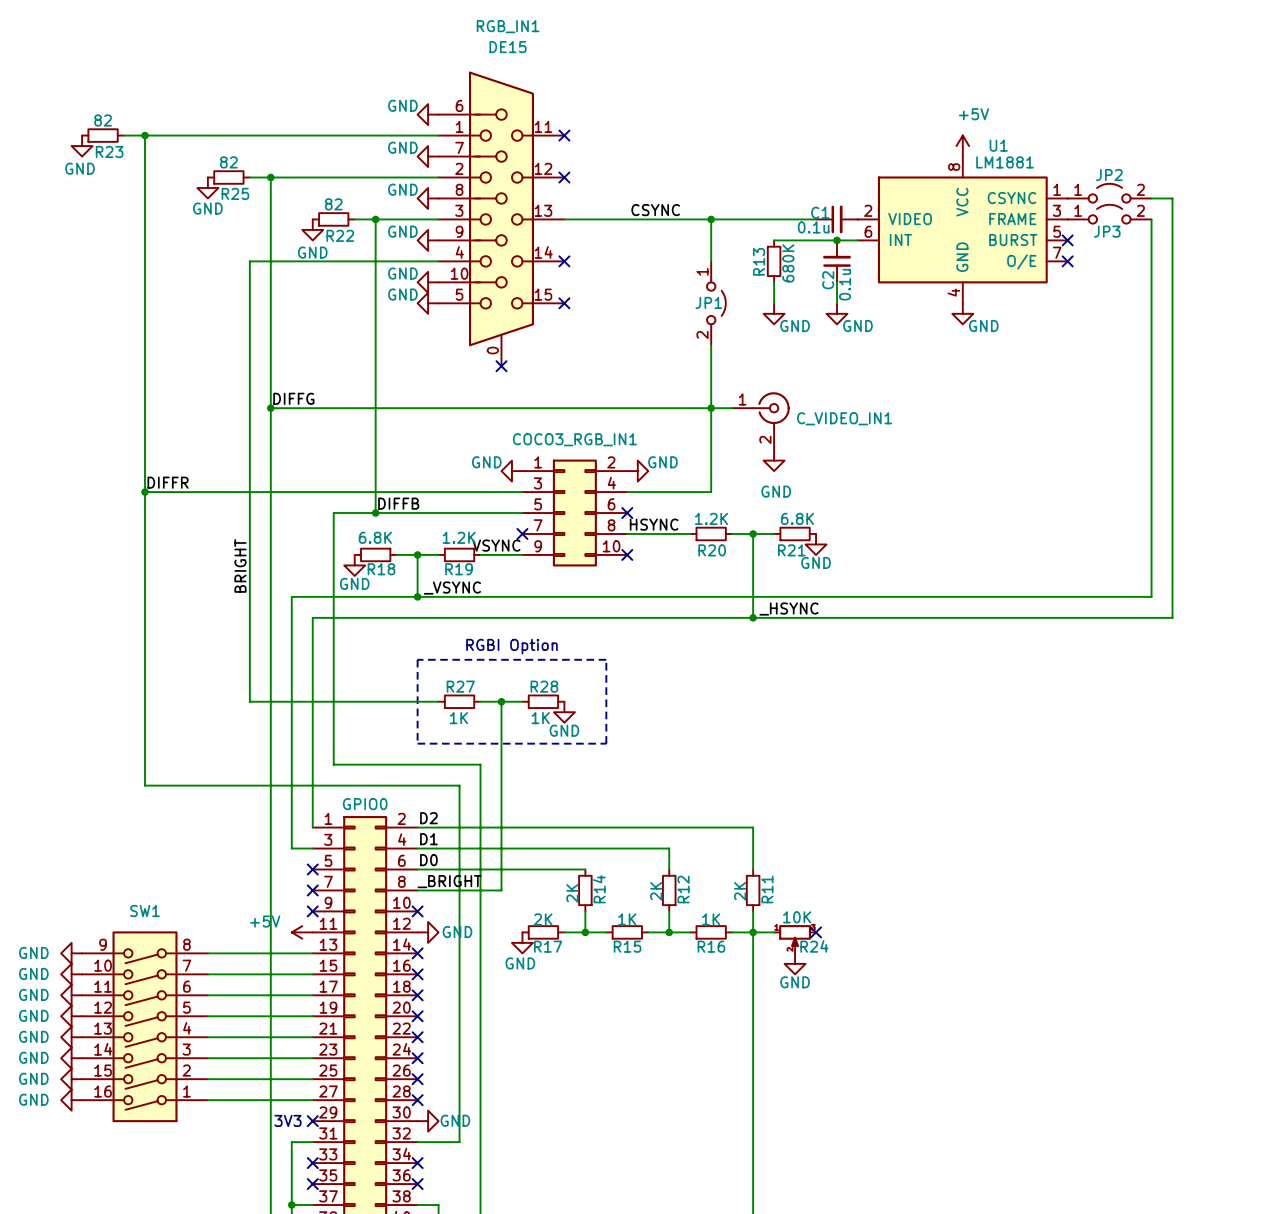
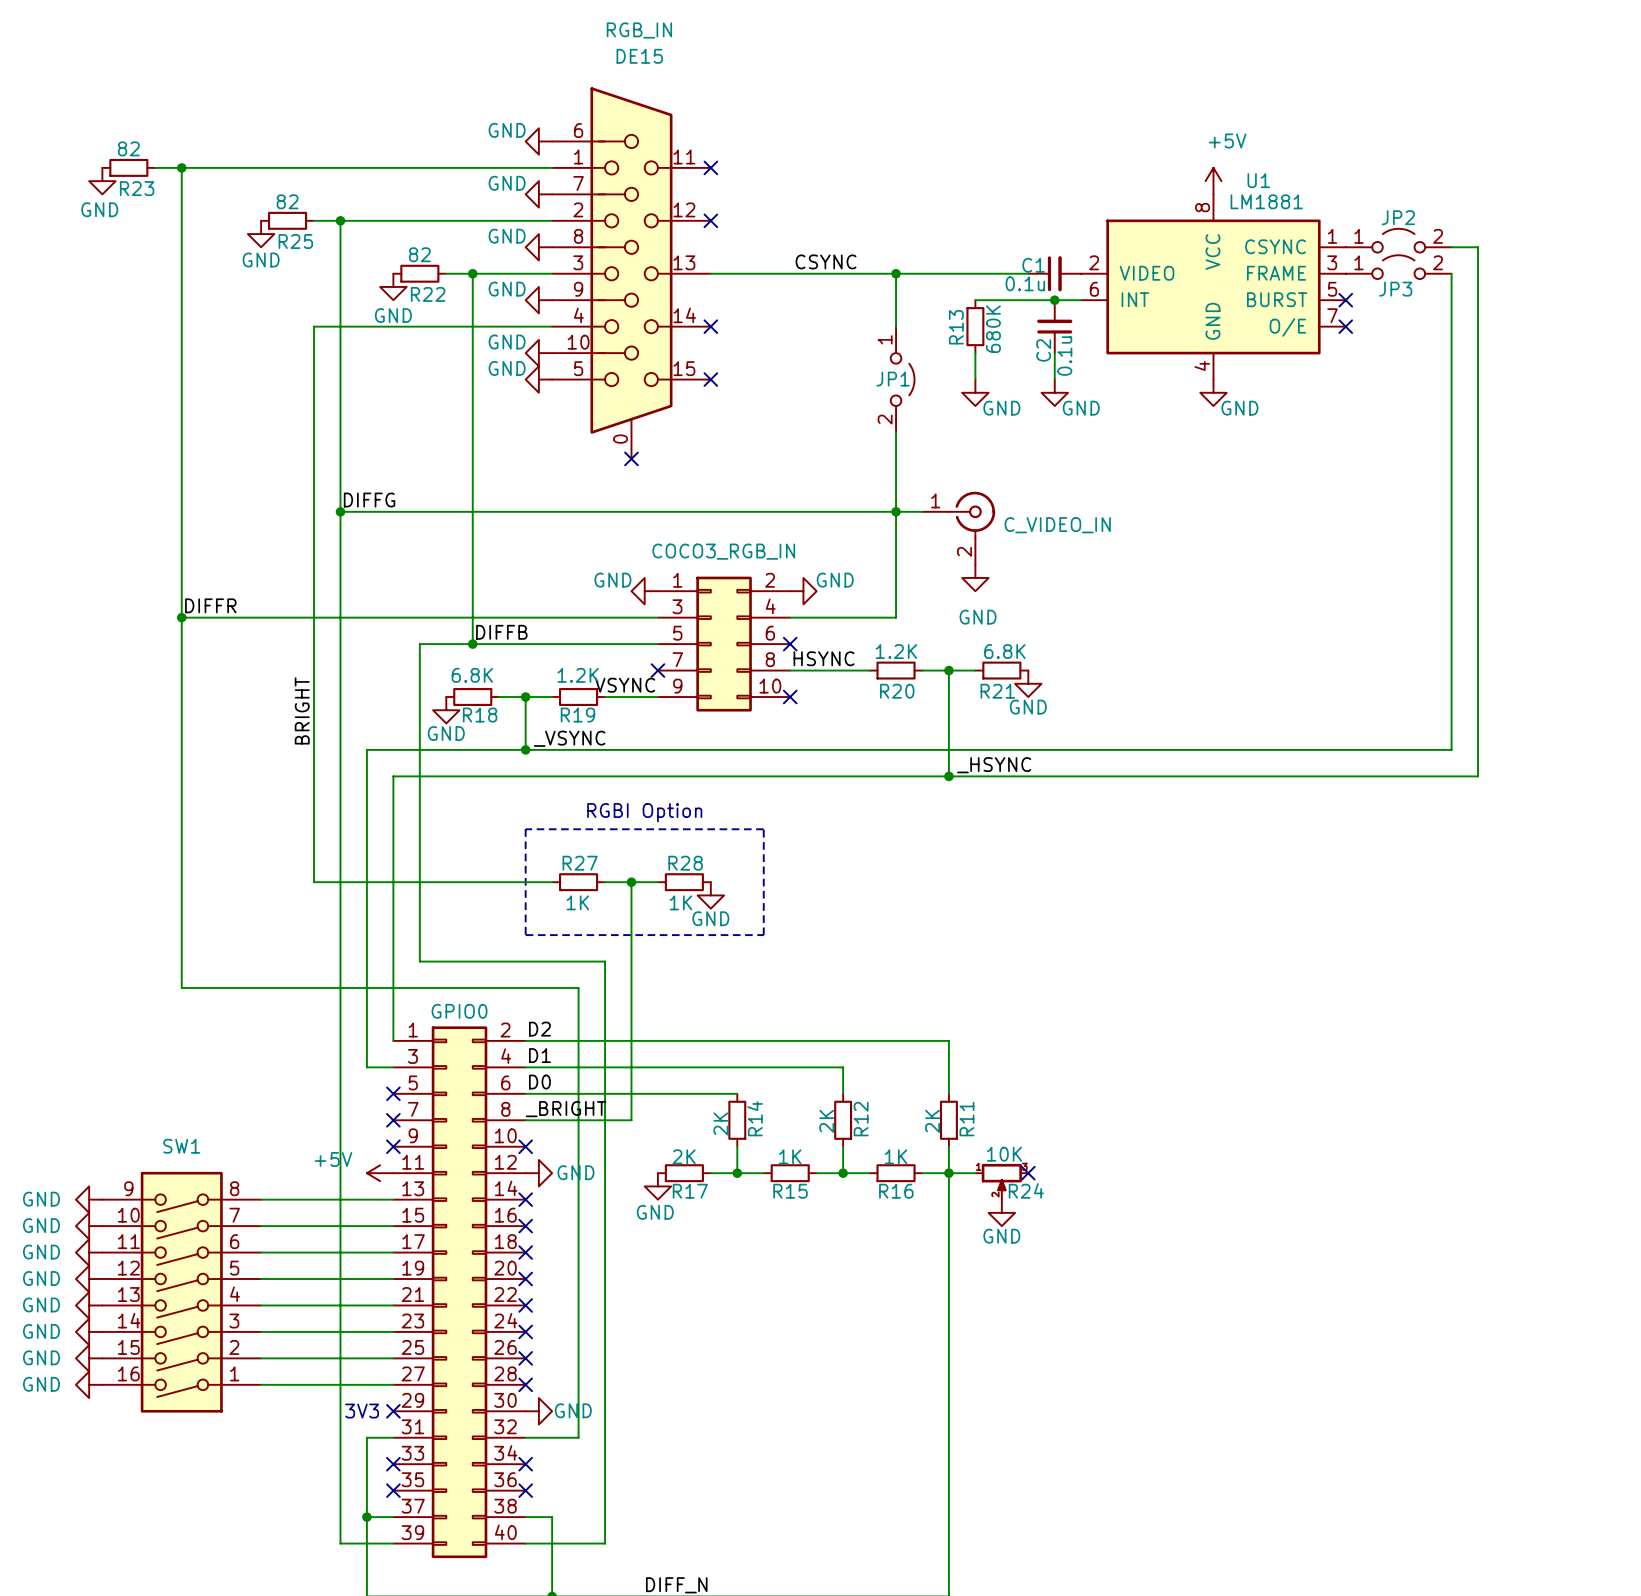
RGB_IN1 name: RGB_IN1 (508, 26) -> RGB_IN (639, 30)
C_VIDEO_IN1 name: C_VIDEO_IN1 (844, 418) -> C_VIDEO_IN (1057, 525)
COCO3_RGB_IN1 name: COCO3_RGB_IN1 (574, 439) -> COCO3_RGB_IN (723, 551)

